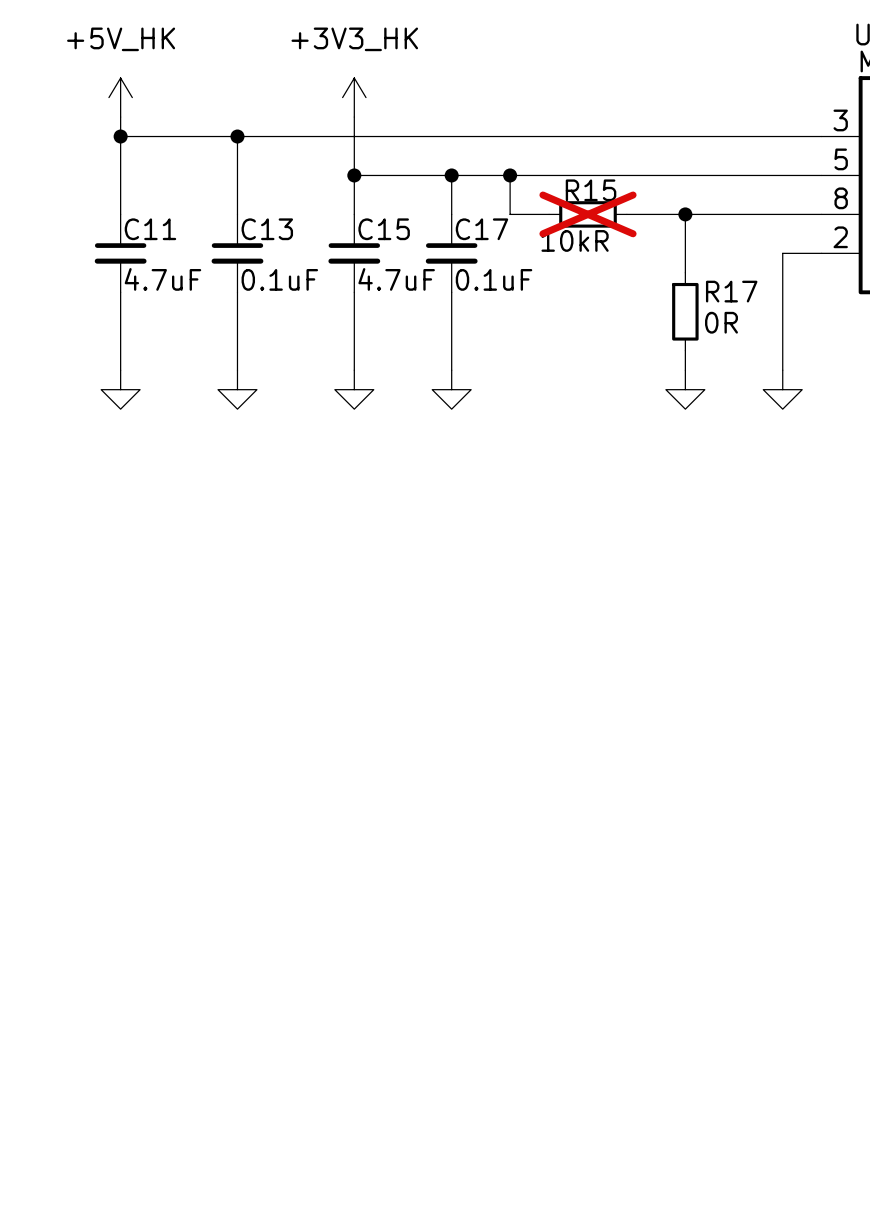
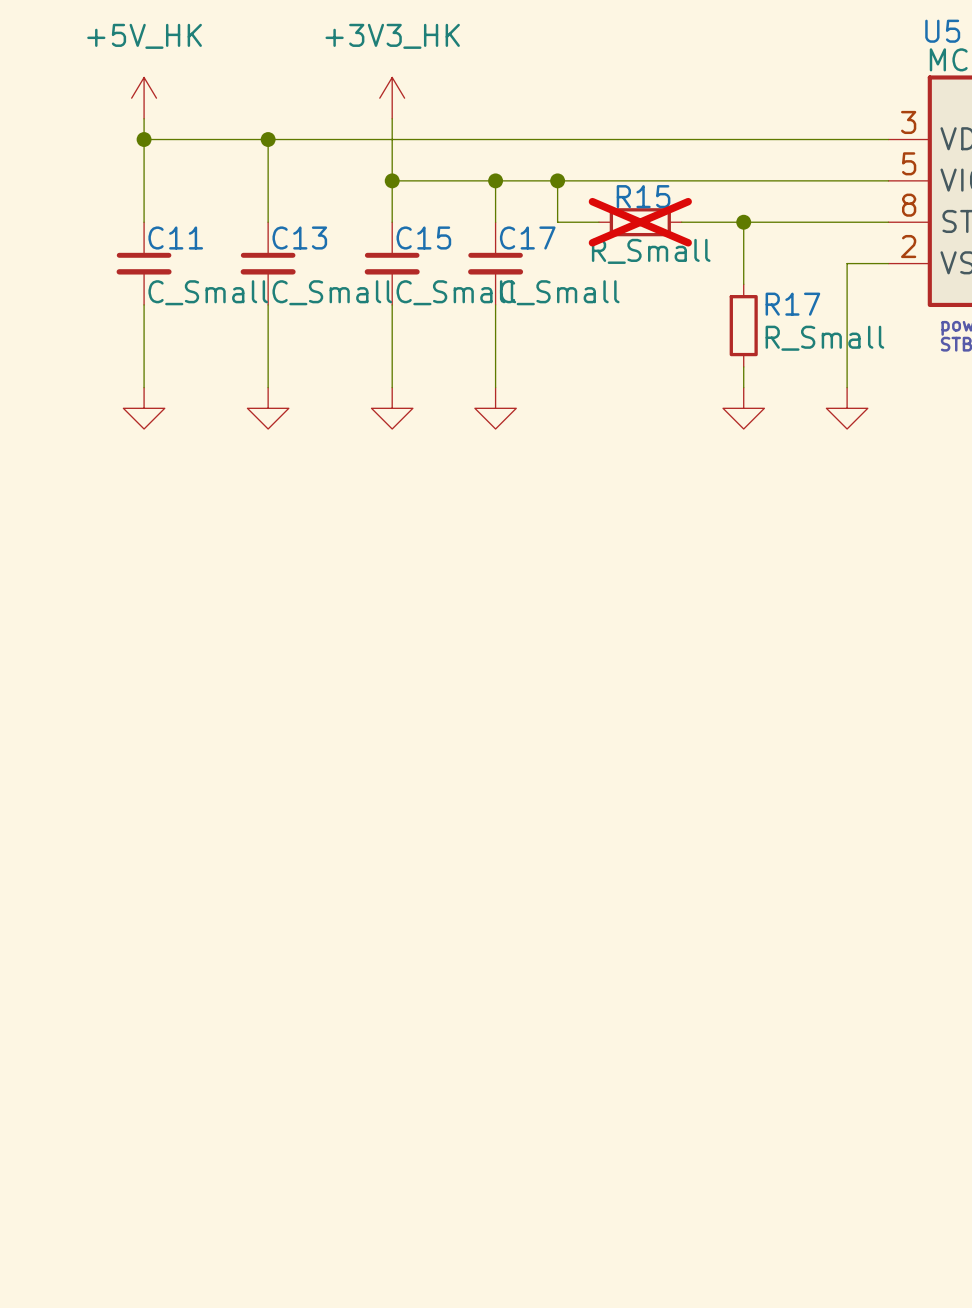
R15 value: 10kR (575, 240) -> R_Small (651, 251)
C11 value: 4.7uF (162, 279) -> C_Small (208, 292)
C13 value: 0.1uF (279, 279) -> C_Small (332, 292)
C15 value: 4.7uF (396, 279) -> C_Small (456, 292)
C17 value: 0.1uF (494, 279) -> C_Small (559, 292)
R17 value: 0R (721, 322) -> R_Small (824, 338)

